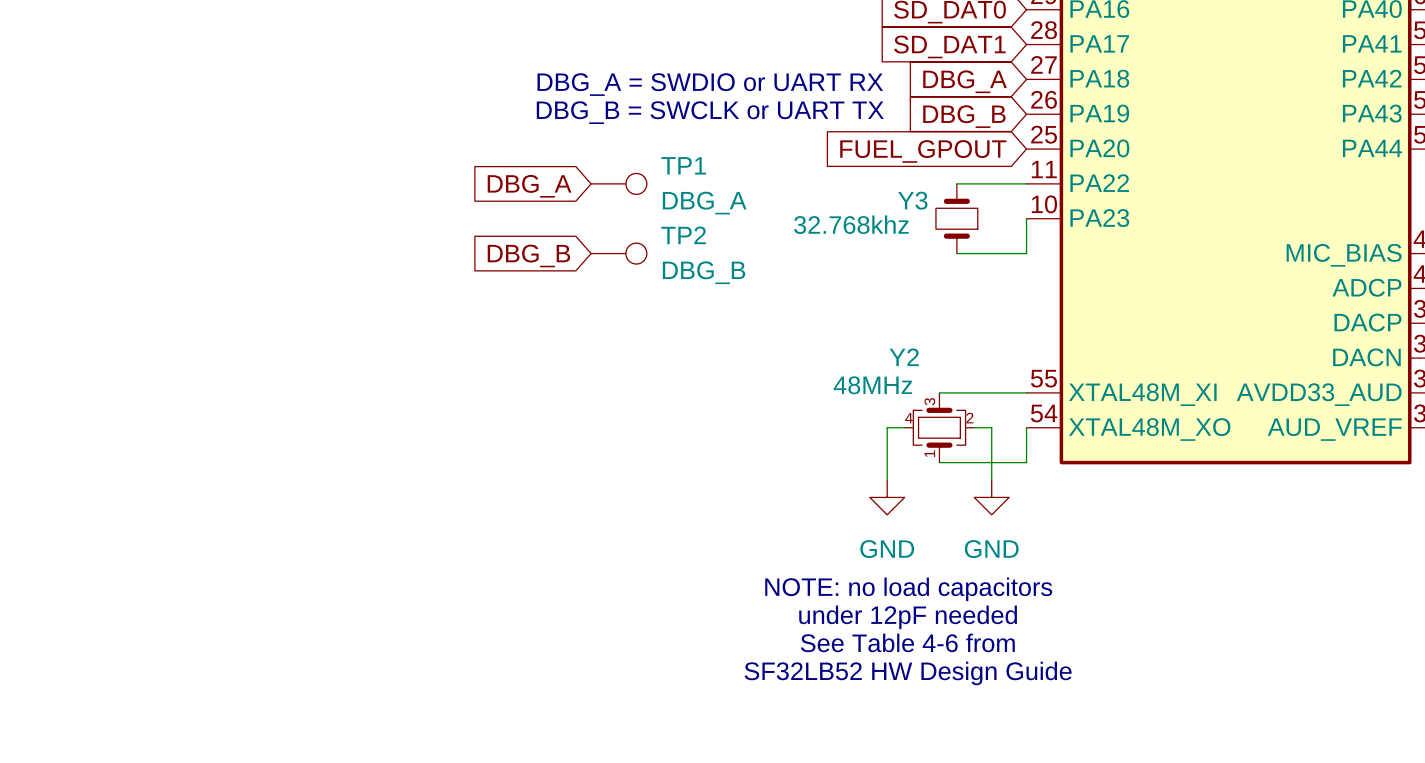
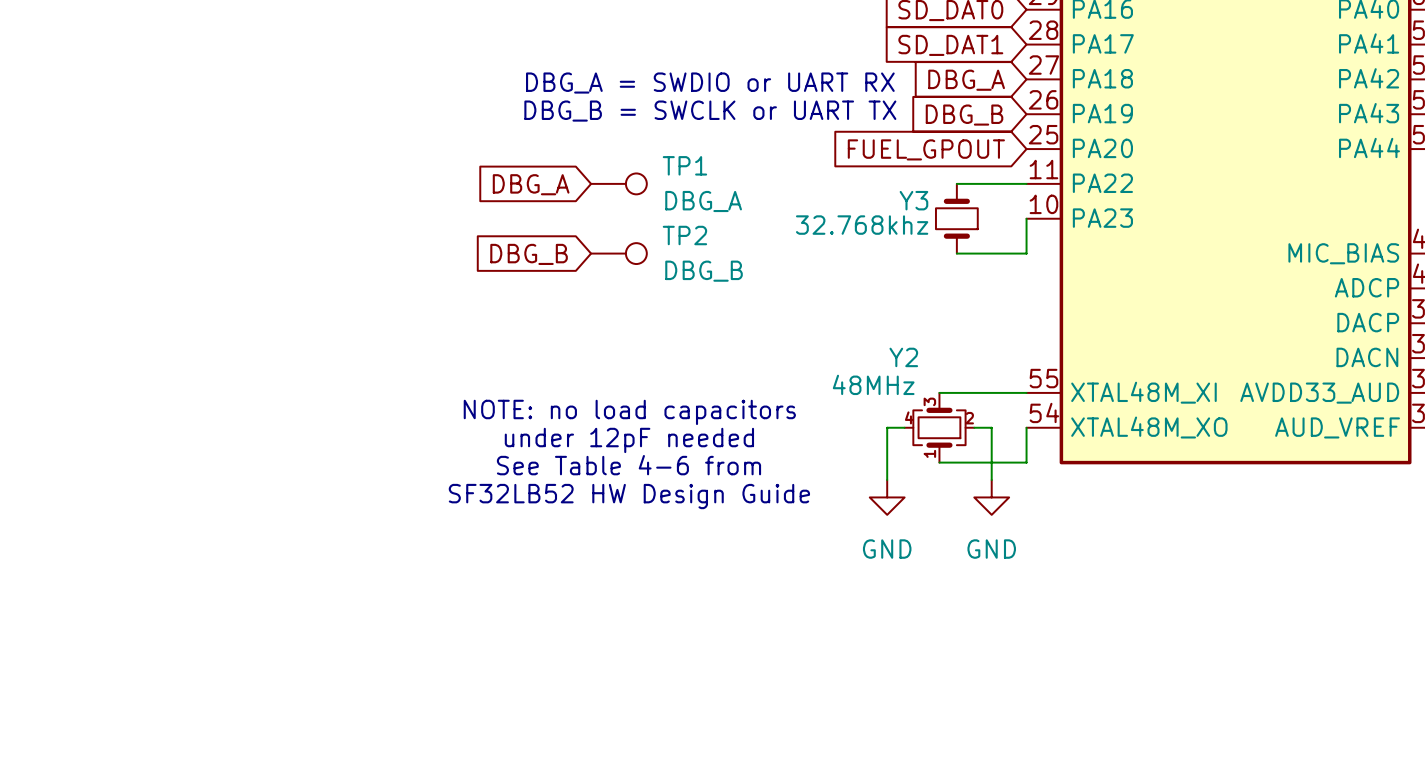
text position: NOTE: no load capacitors (908, 589) -> NOTE: no load capacitors (629, 412)
text position: under 12pF needed (908, 617) -> under 12pF needed (629, 440)
text position: See Table 4-6 from (907, 642) -> See Table 4-6 from (628, 465)
text position: SF32LB52 HW Design Guide (908, 673) -> SF32LB52 HW Design Guide (629, 496)

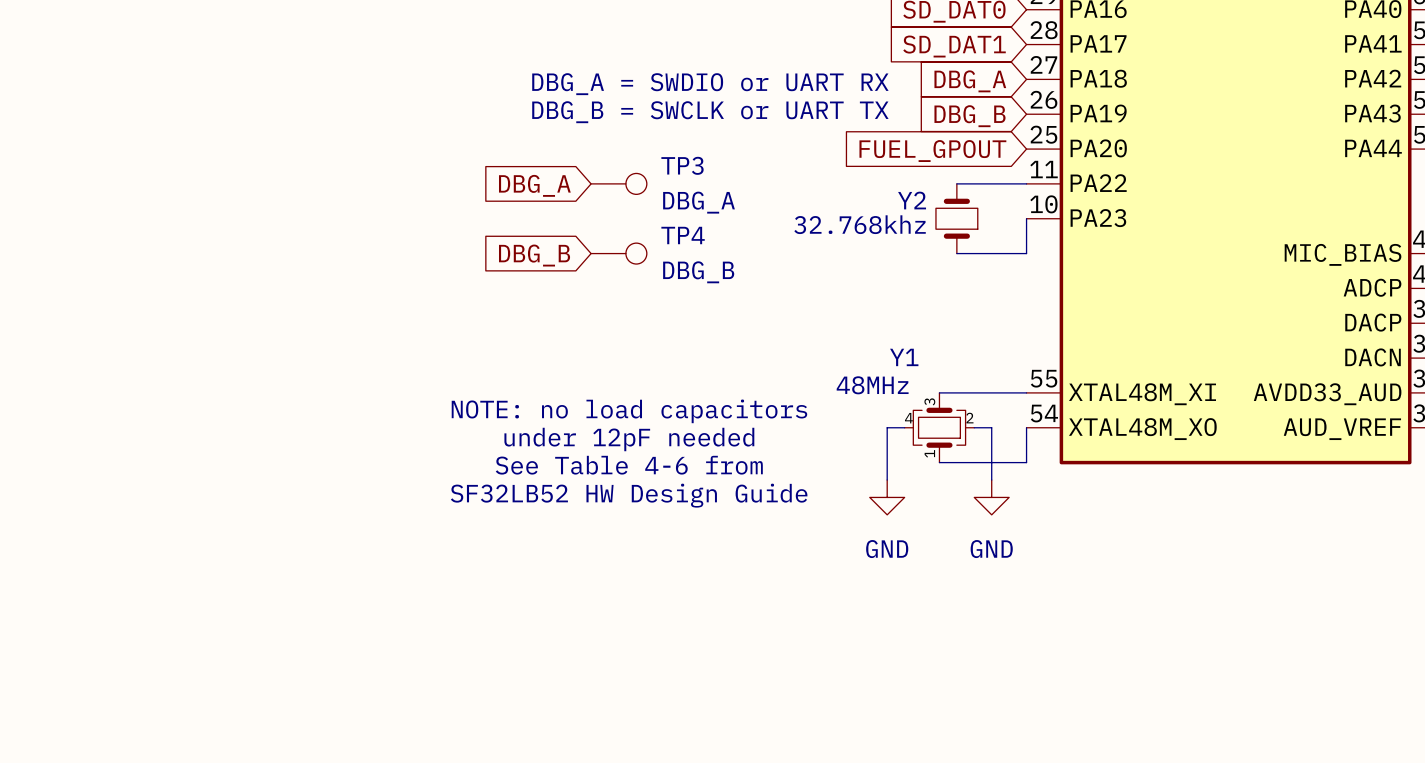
TP1 name: TP1 (684, 165) -> TP3 (682, 165)
Y3 name: Y3 (913, 200) -> Y2 (912, 200)
TP2 name: TP2 (684, 235) -> TP4 (683, 235)
Y2 name: Y2 (903, 357) -> Y1 (904, 357)

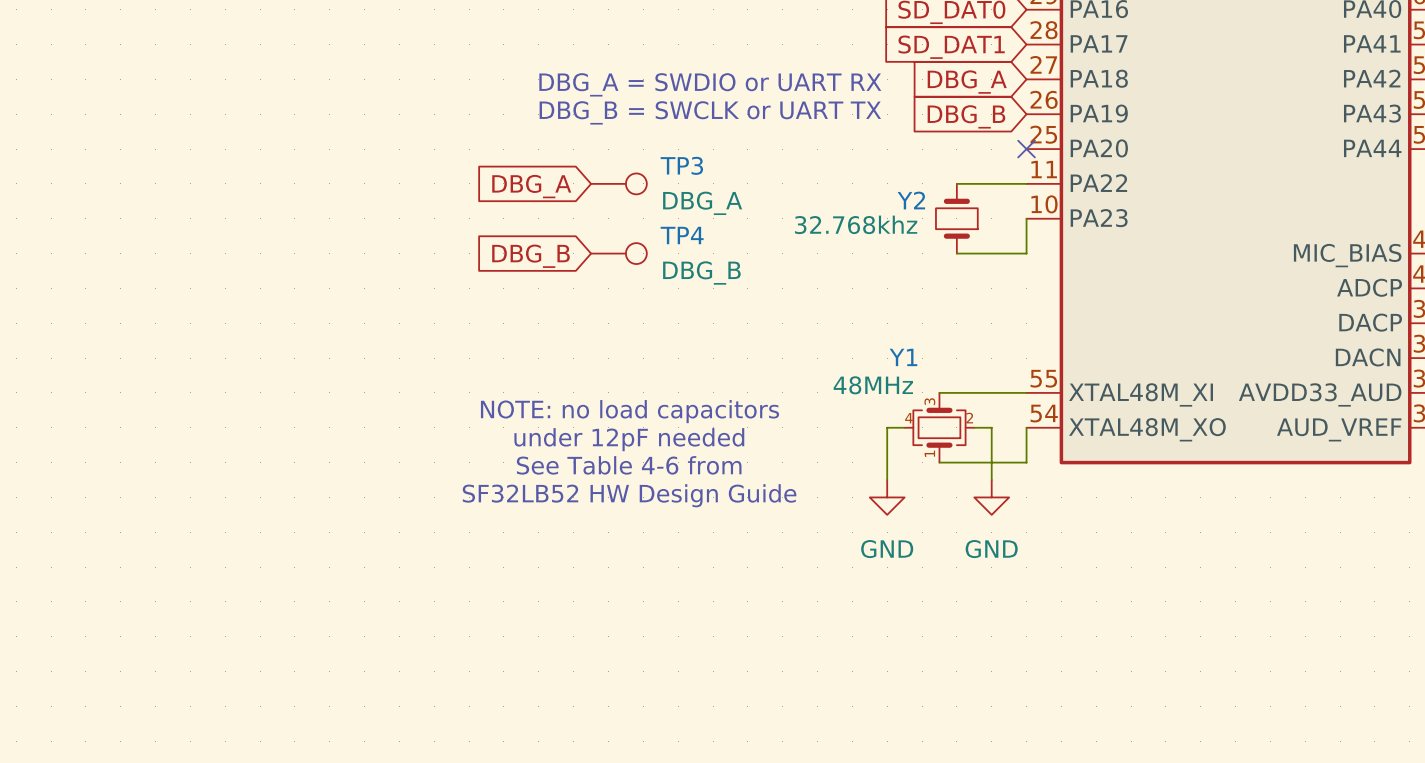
no-connect mark: none -> (1026, 149)
global label: FUEL_GPOUT (932, 151) -> none

